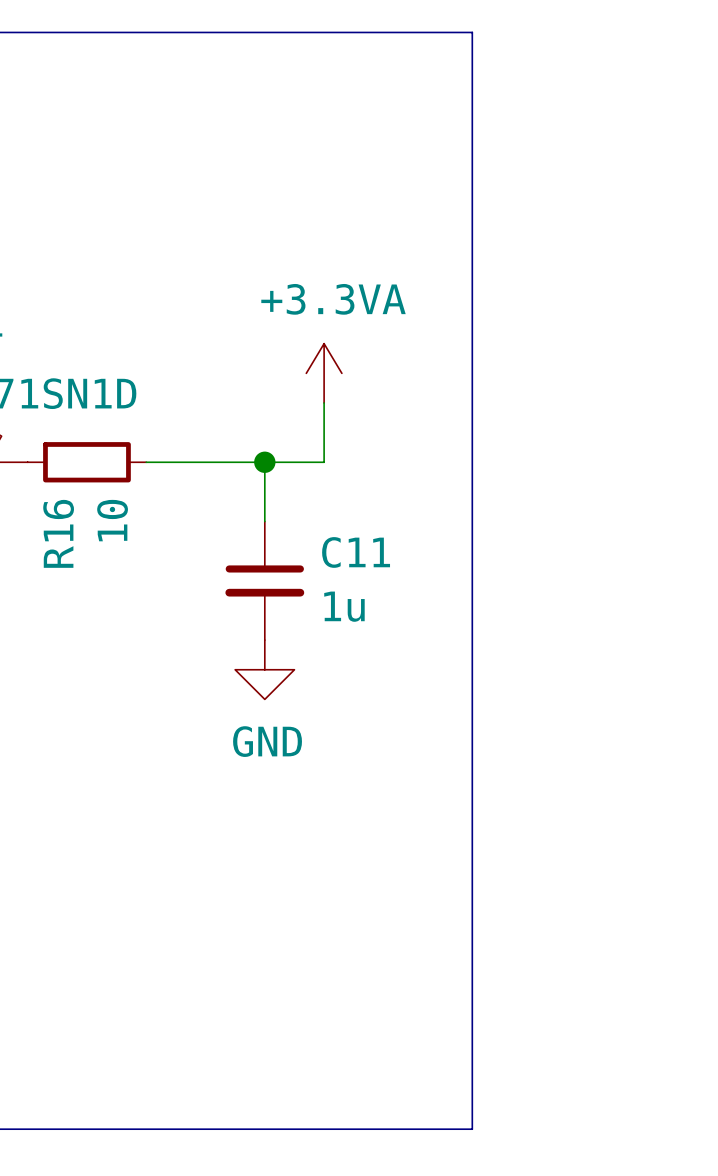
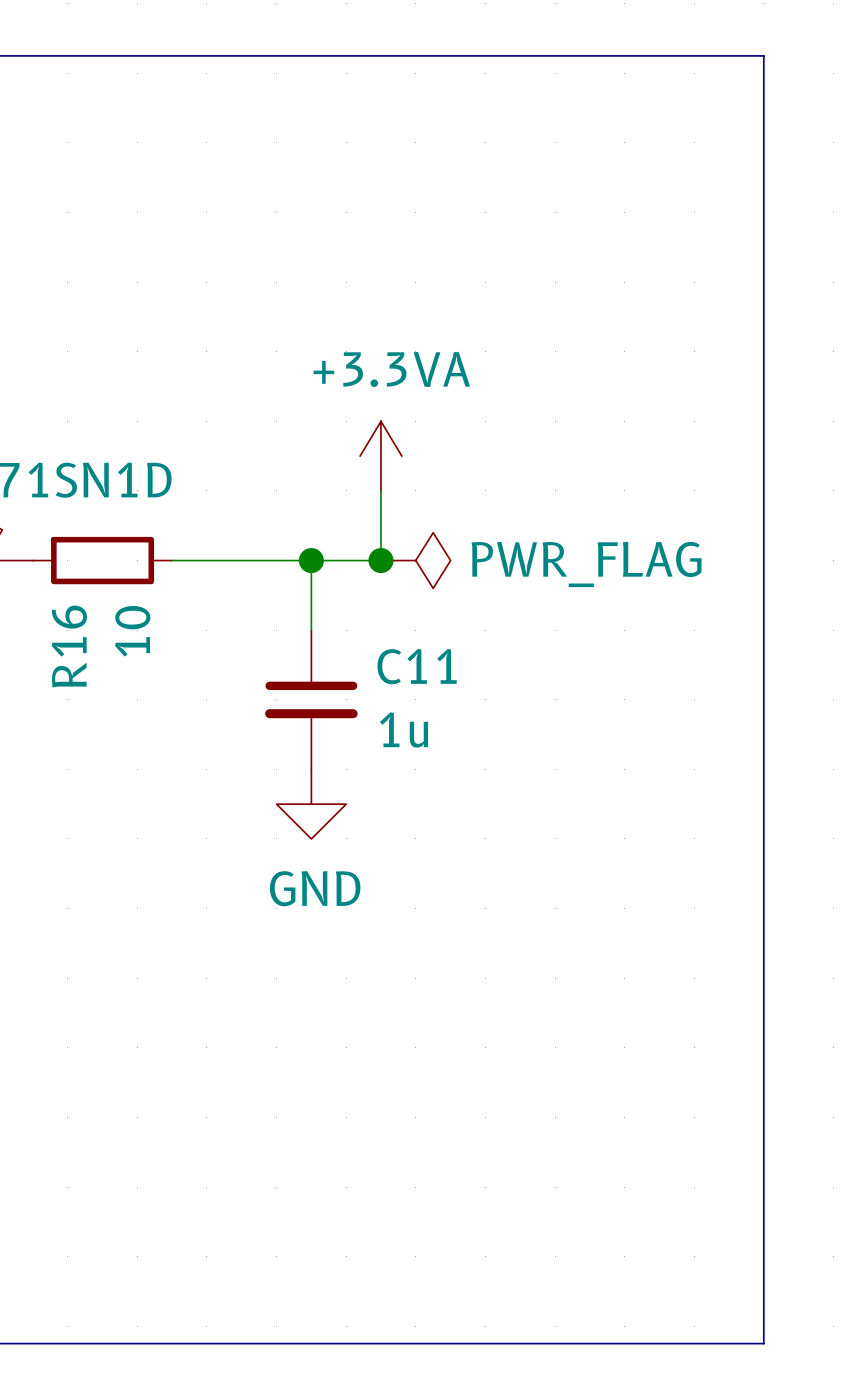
line: (472, 32) (472, 1129) -> (555, 55) (763, 55) (763, 1343) (555, 1343)
junction: none -> (380, 560)
power symbol: none -> PWR_FLAG (415, 560)

